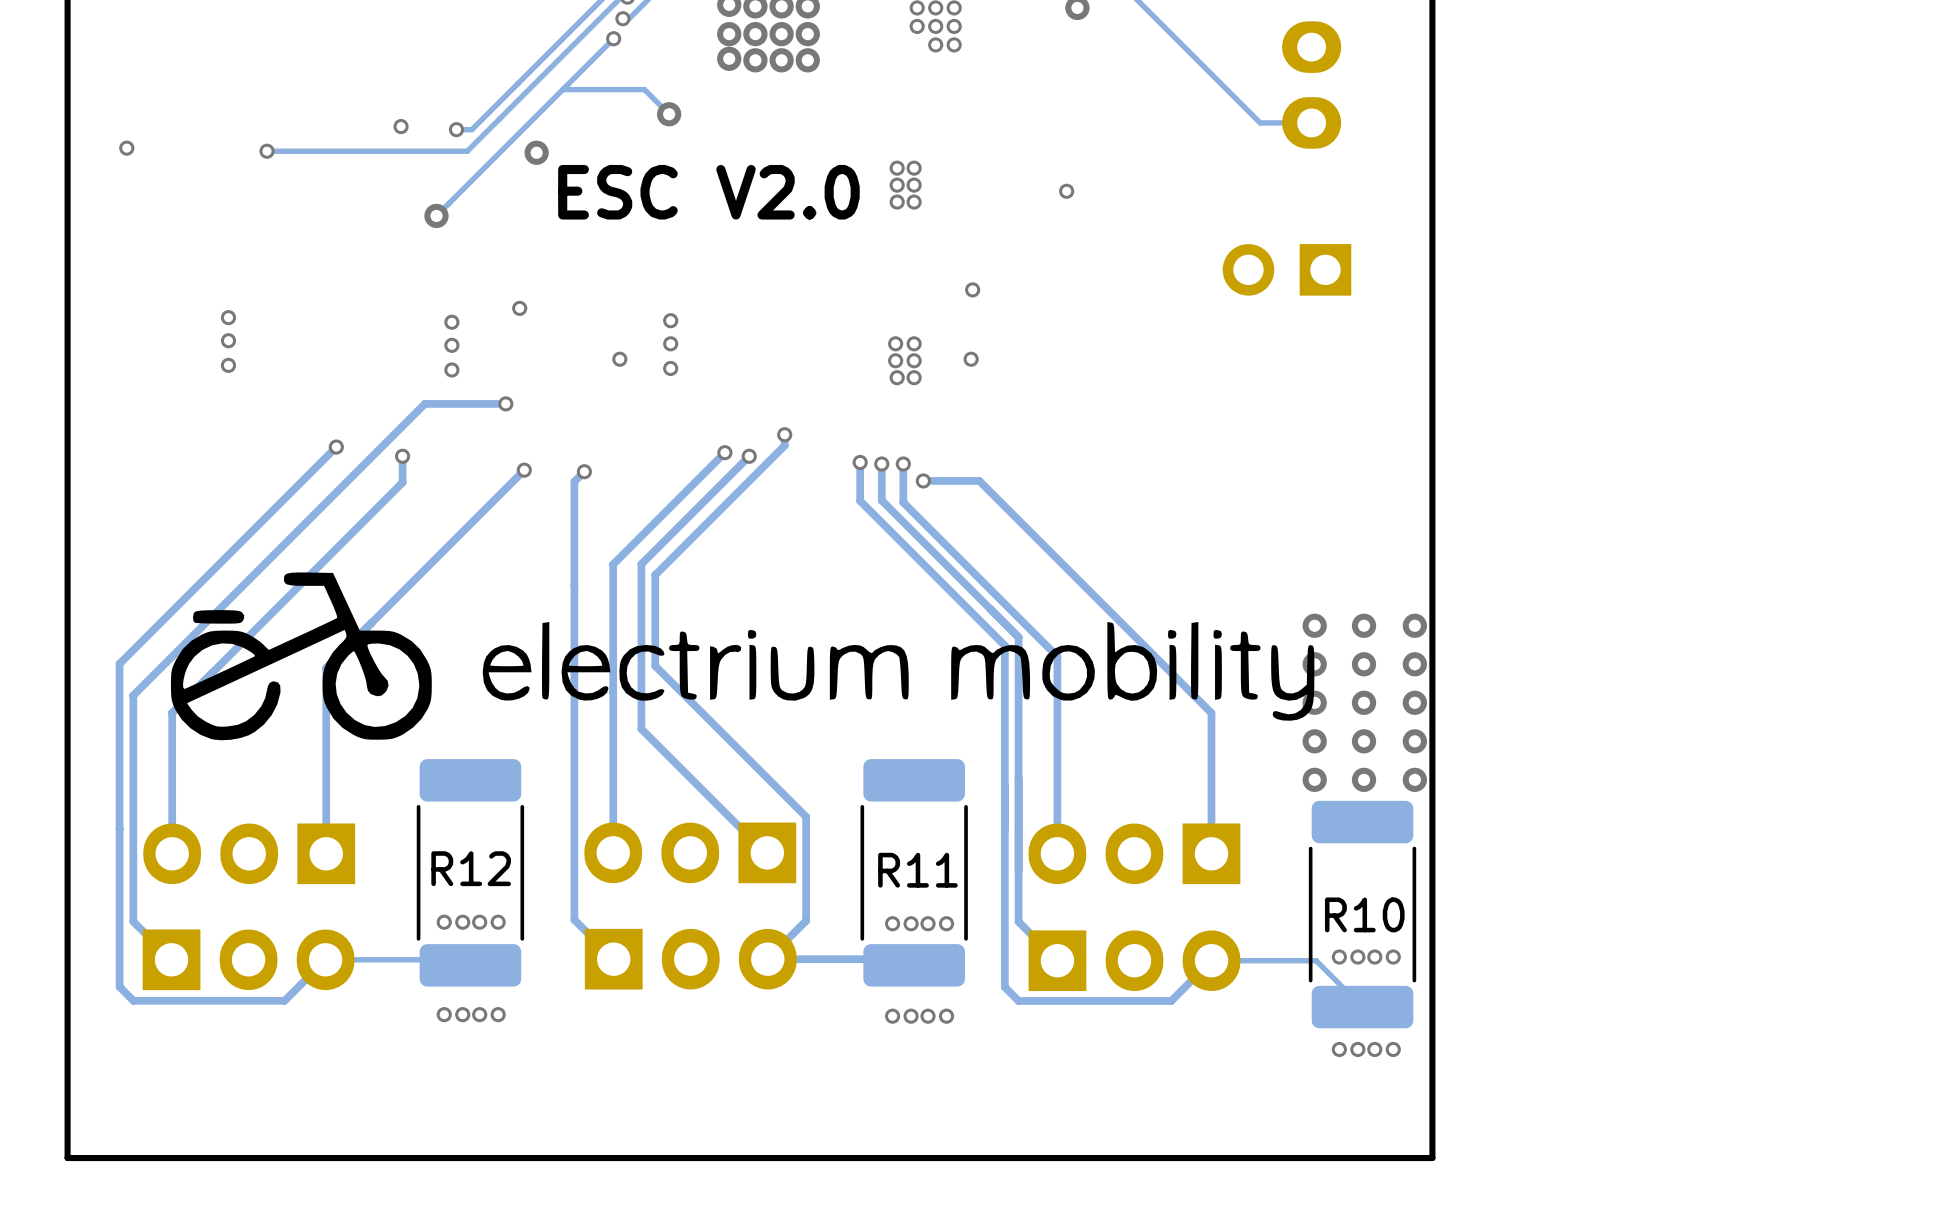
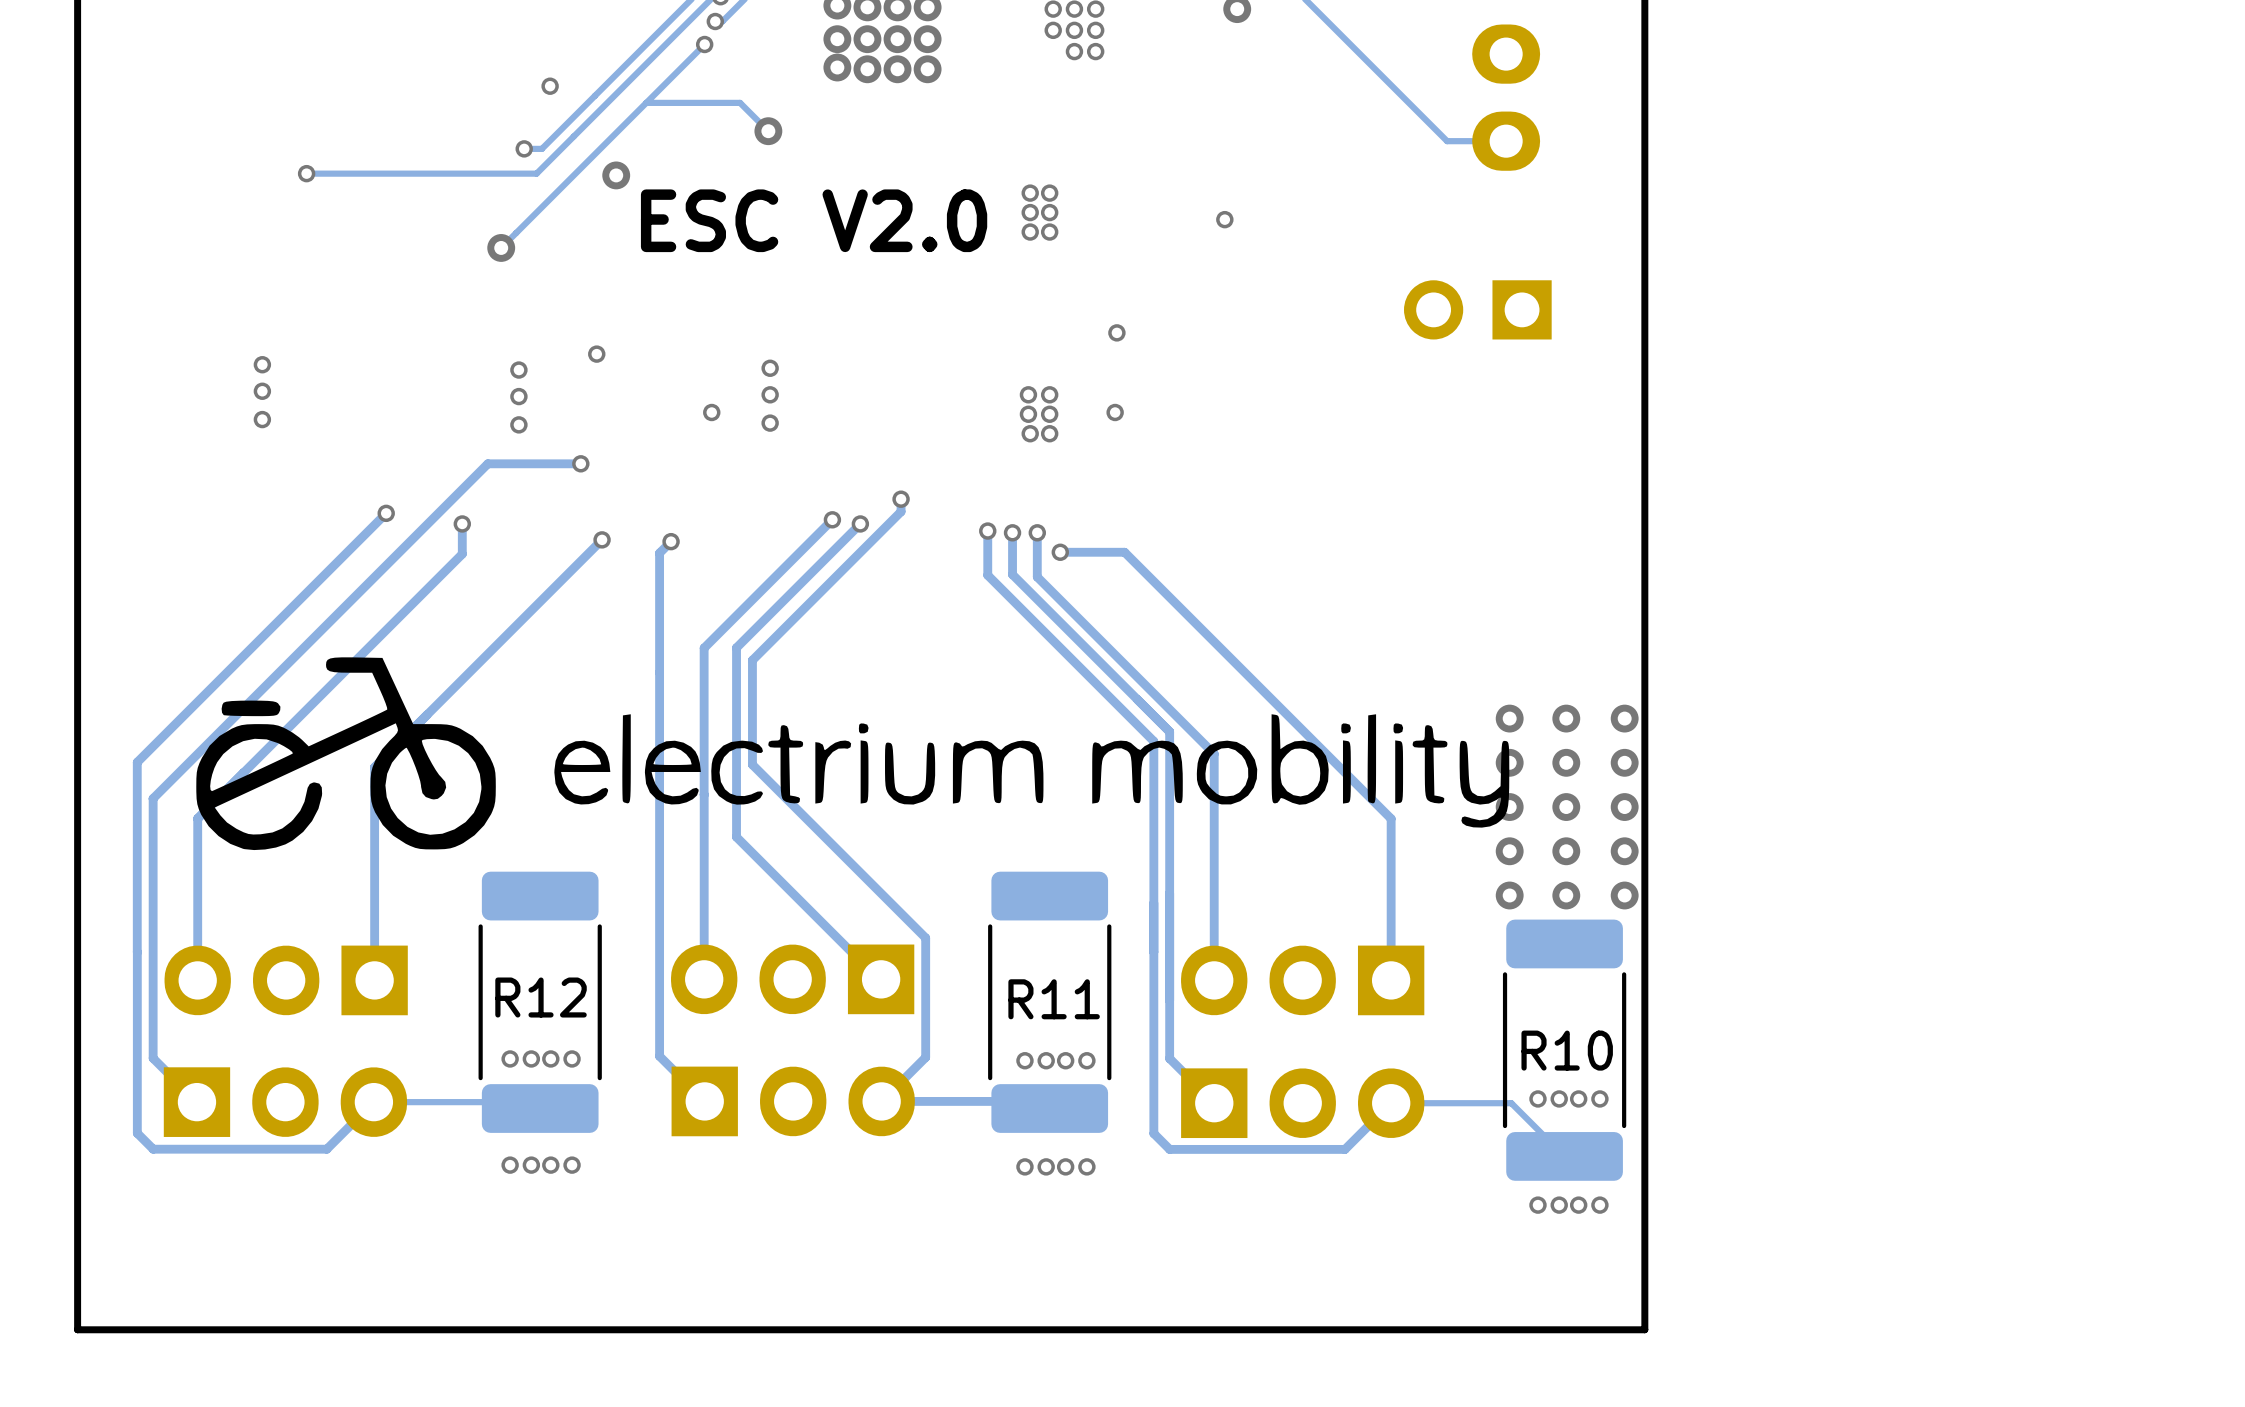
via position: (401, 126) -> (550, 86)
via: (126, 148) -> none

